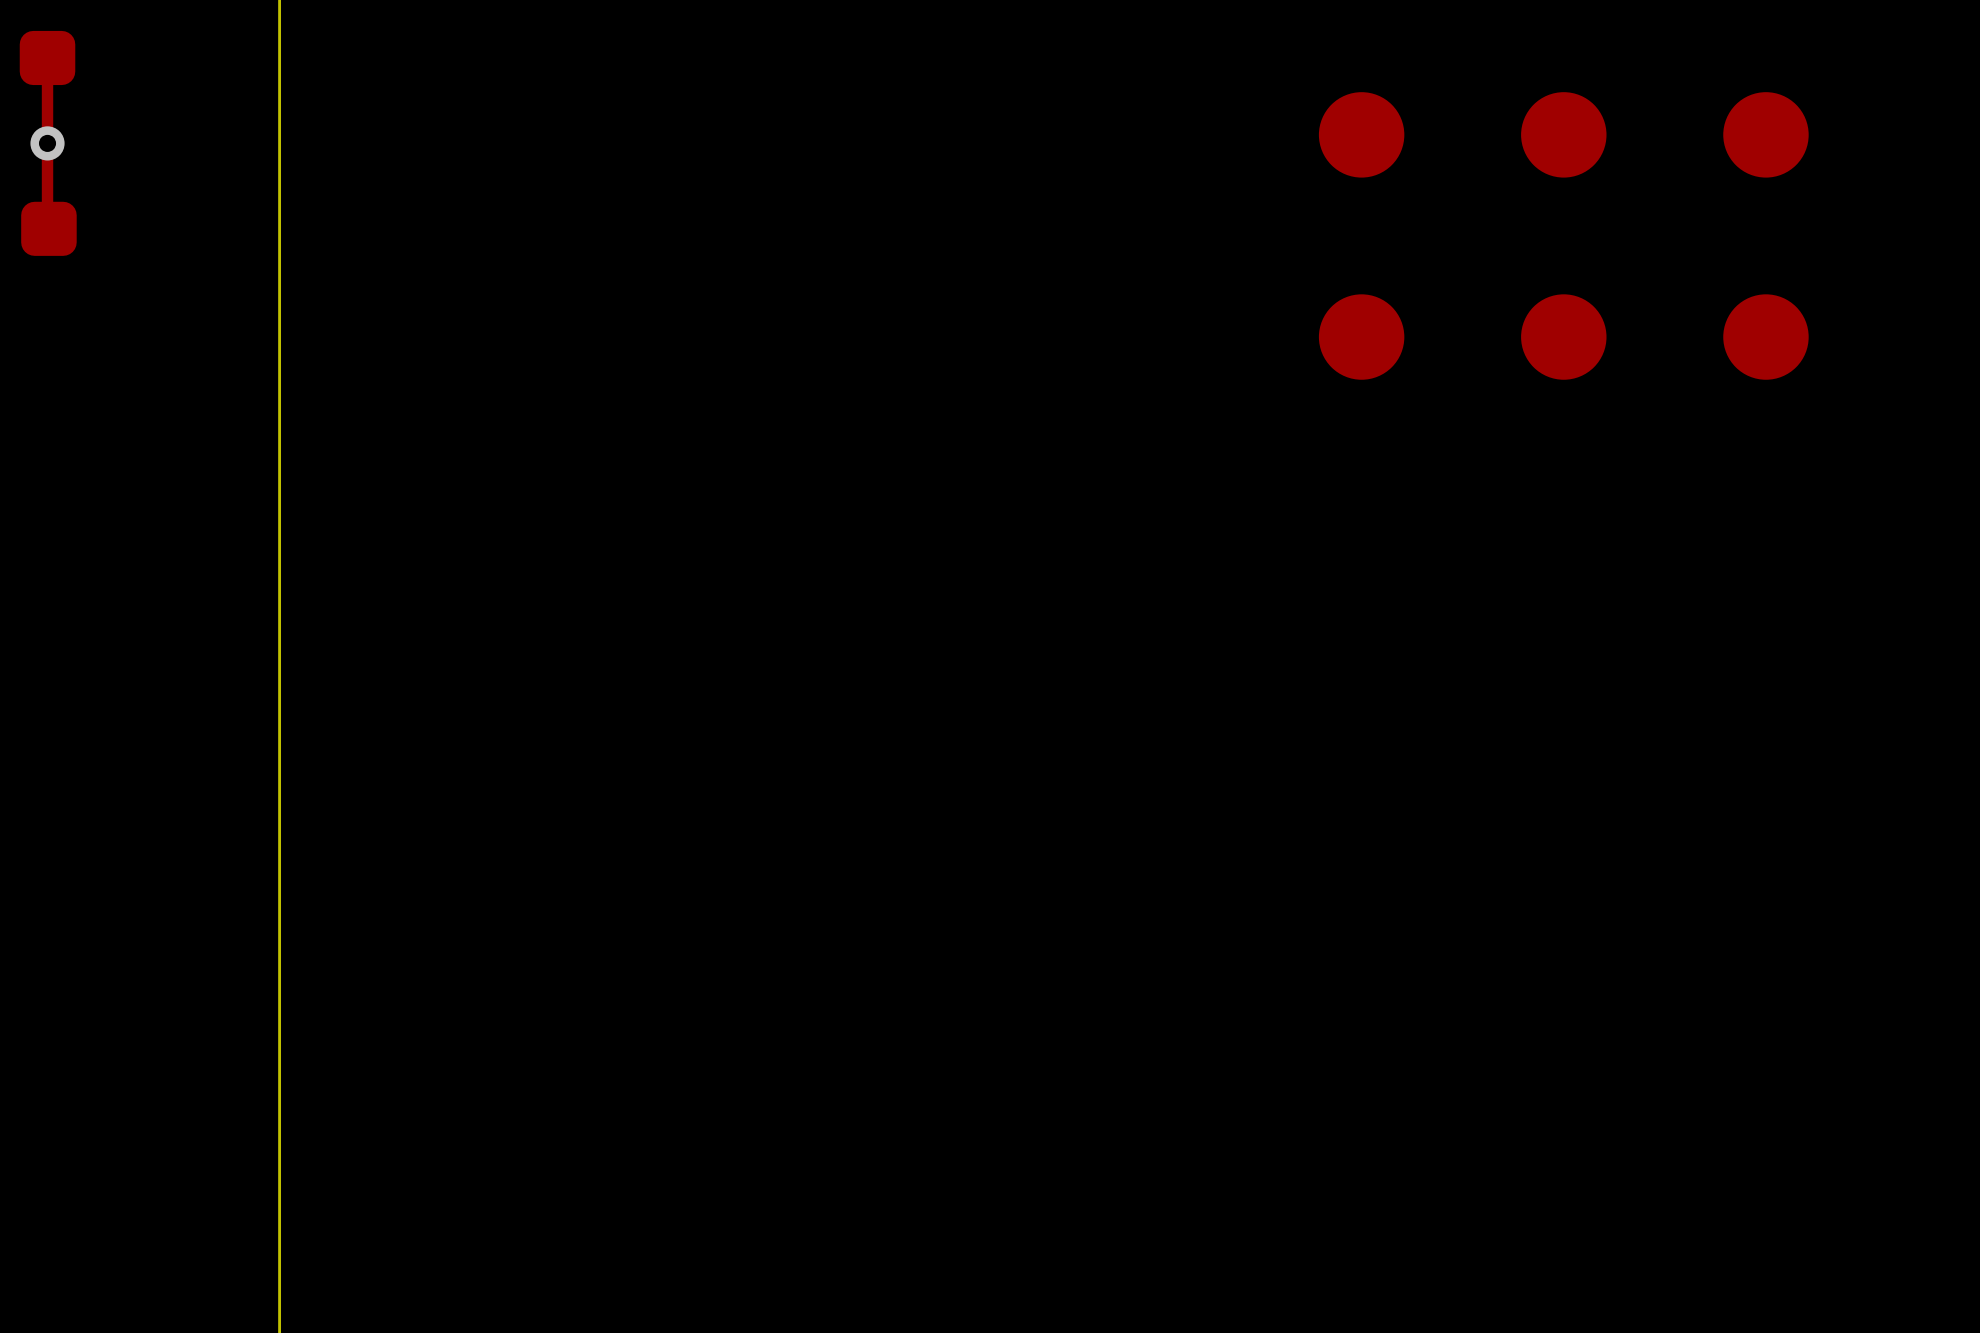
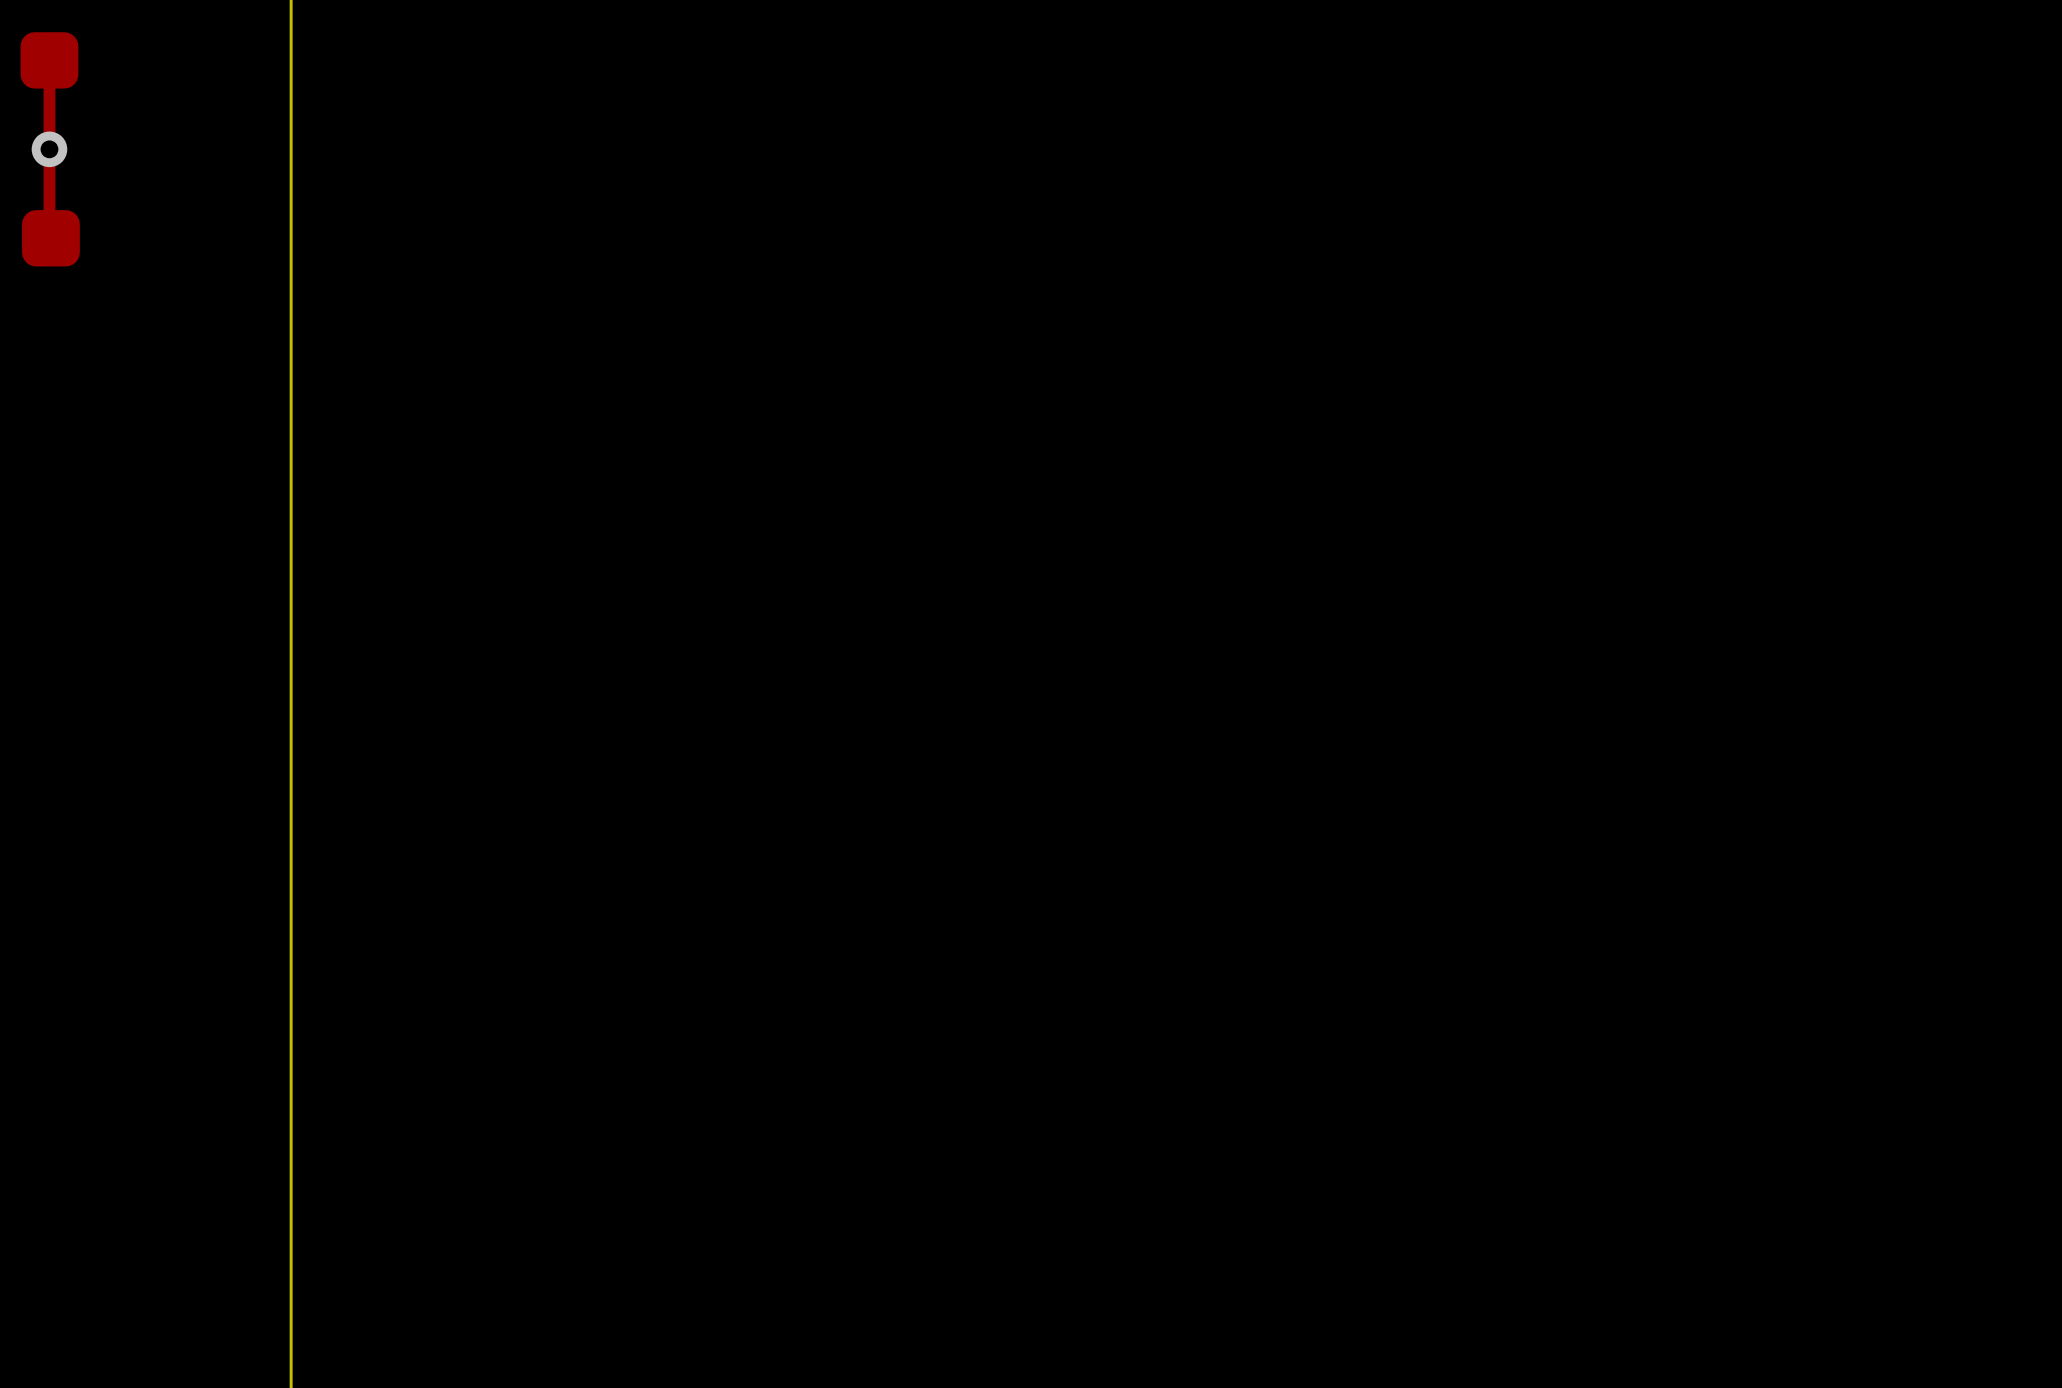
part: (1361, 134) -> none
part: (1563, 134) -> none
part: (1765, 134) -> none
part: (1361, 337) -> none
part: (1563, 337) -> none
part: (1765, 337) -> none

